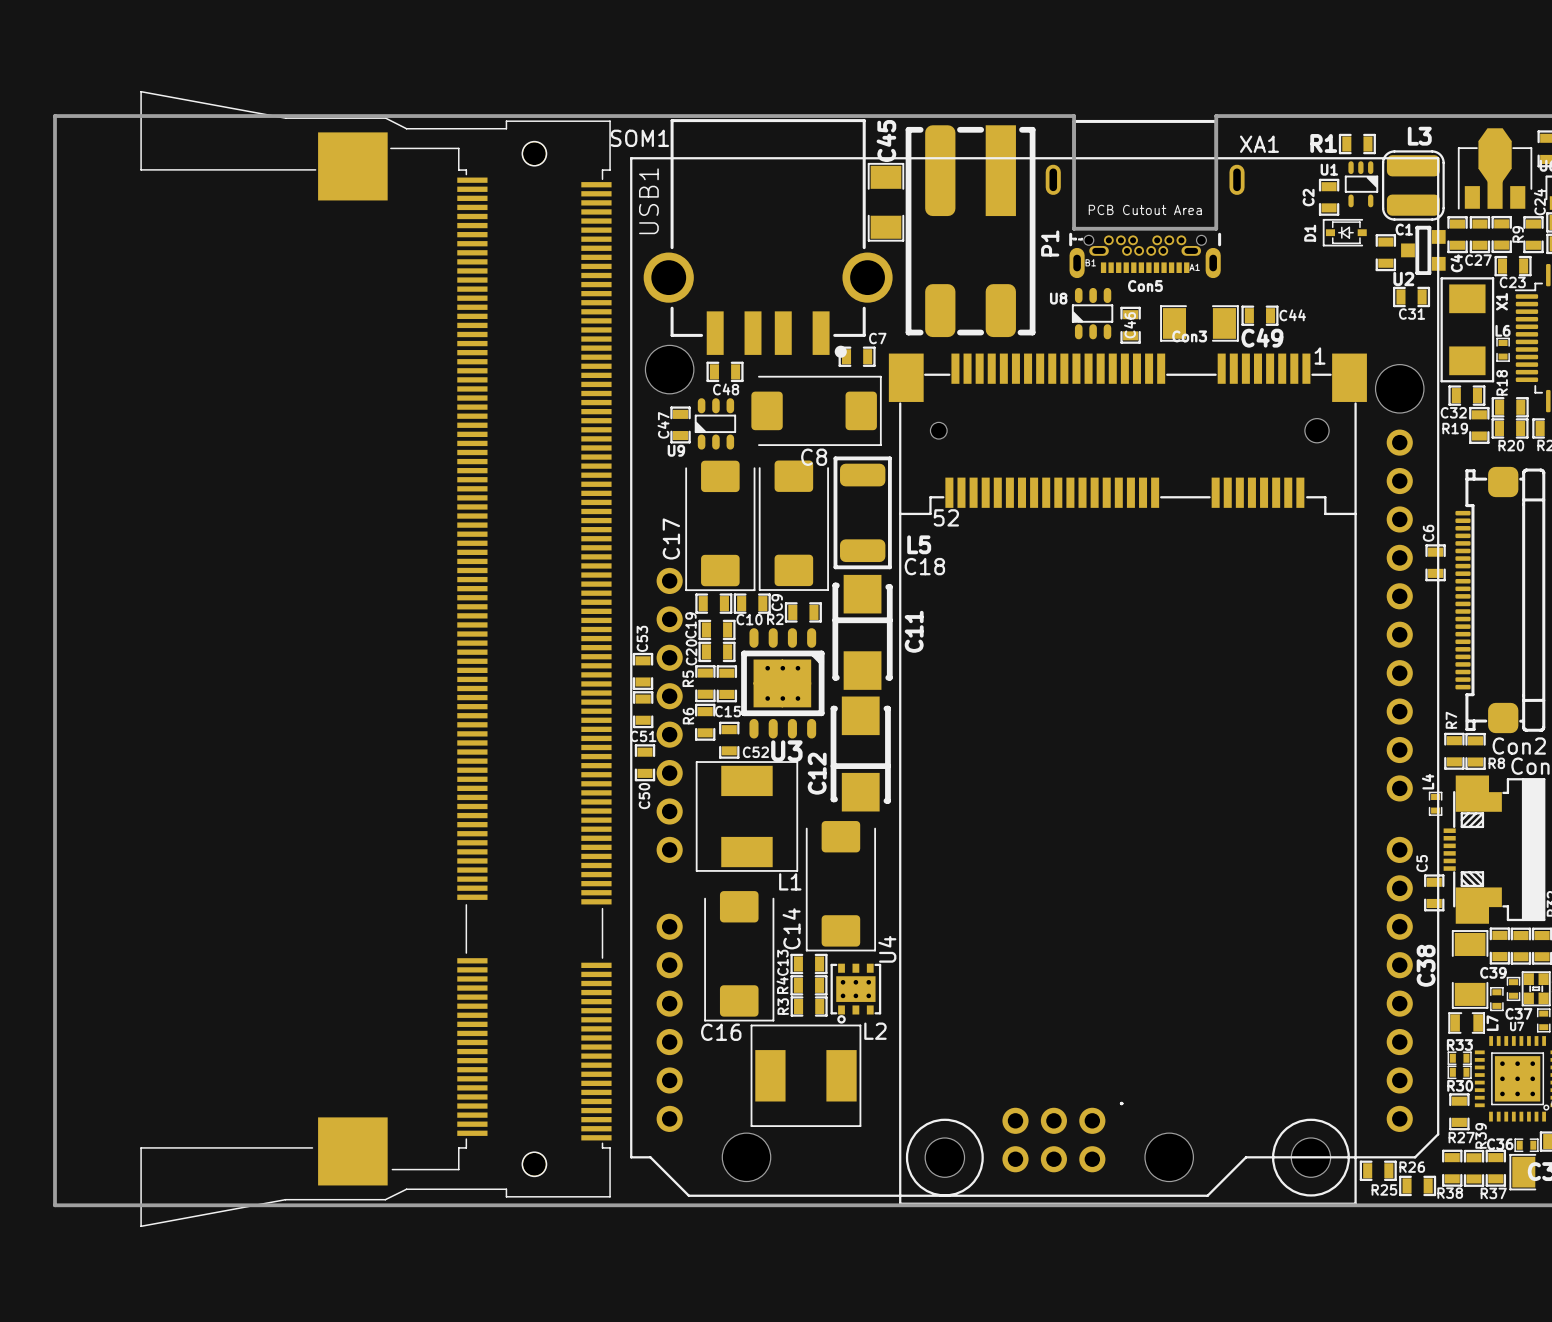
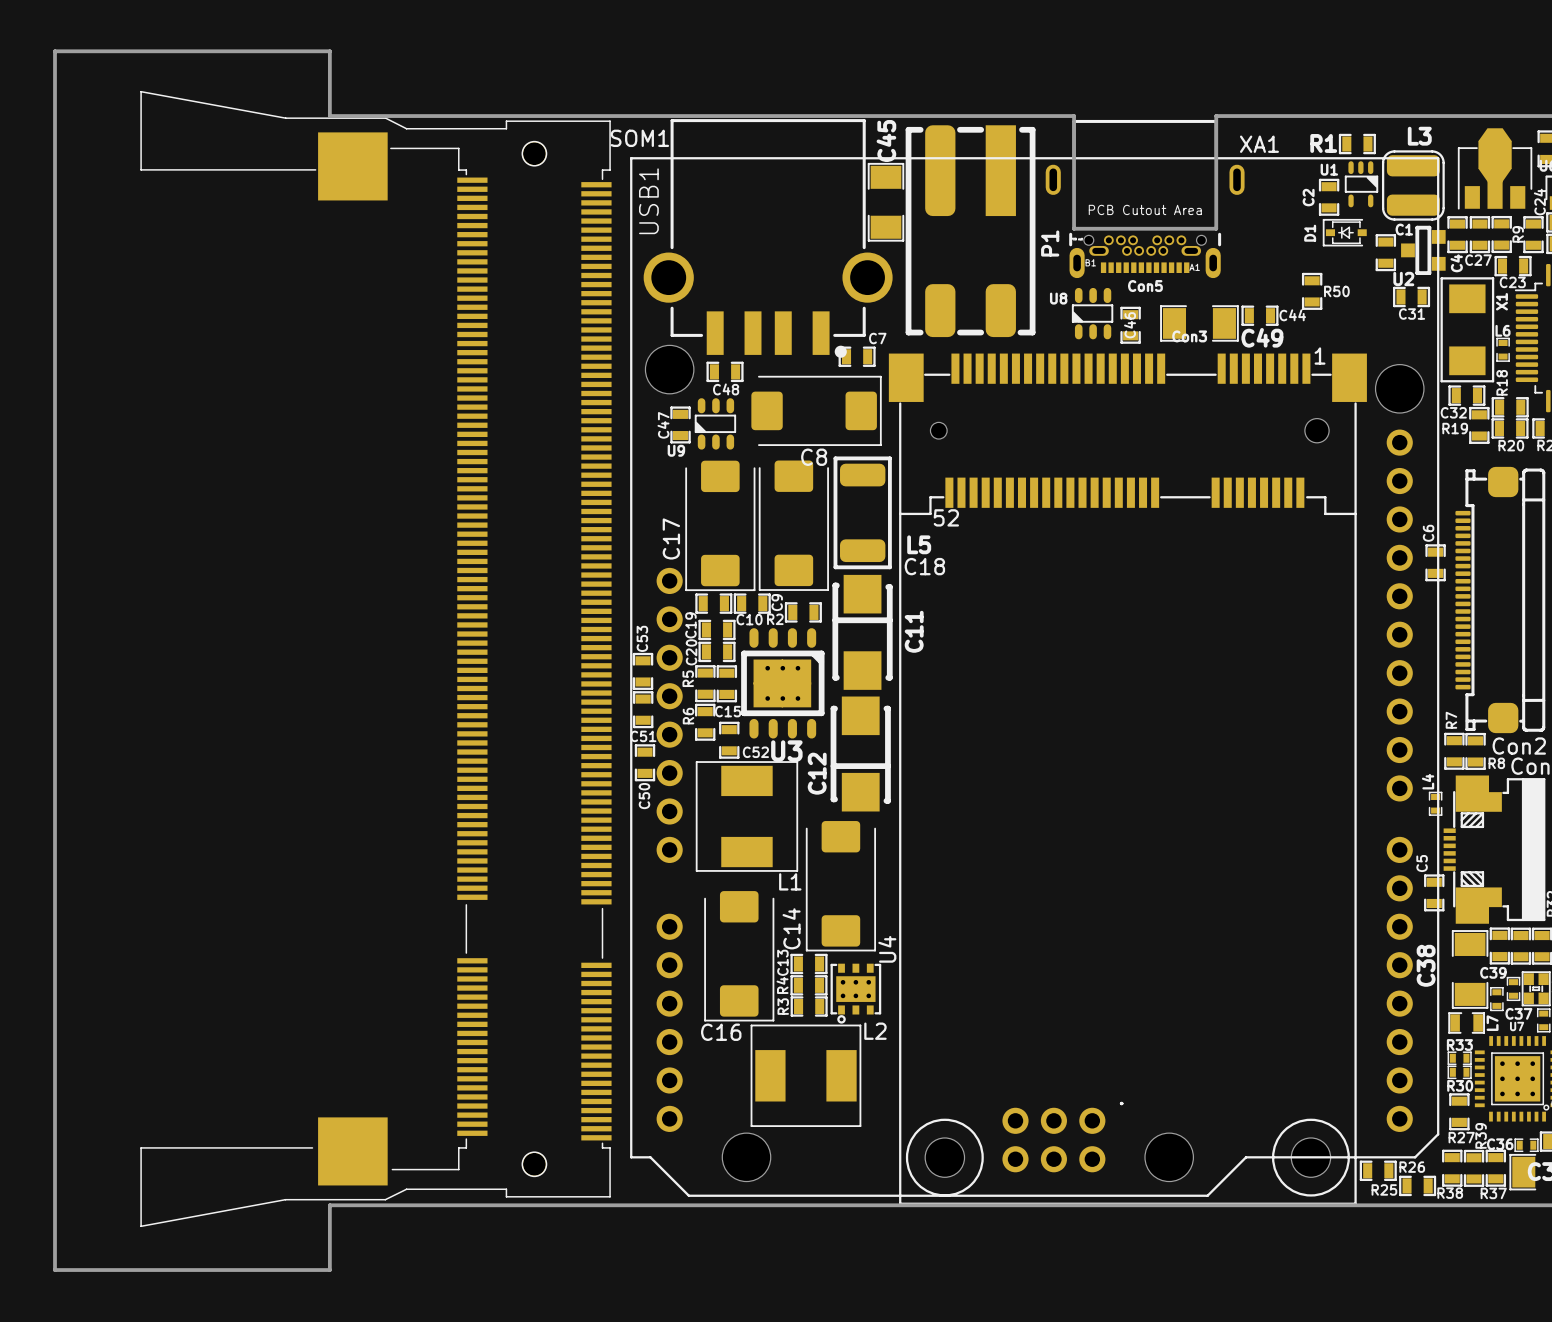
board edge: (54, 116) (329, 116) -> (54, 116) (54, 51) (329, 51) (329, 116)
R50: none -> (1312, 291)
board edge: (54, 1205) (329, 1205) -> (54, 1205) (54, 1270) (329, 1270) (329, 1205)

